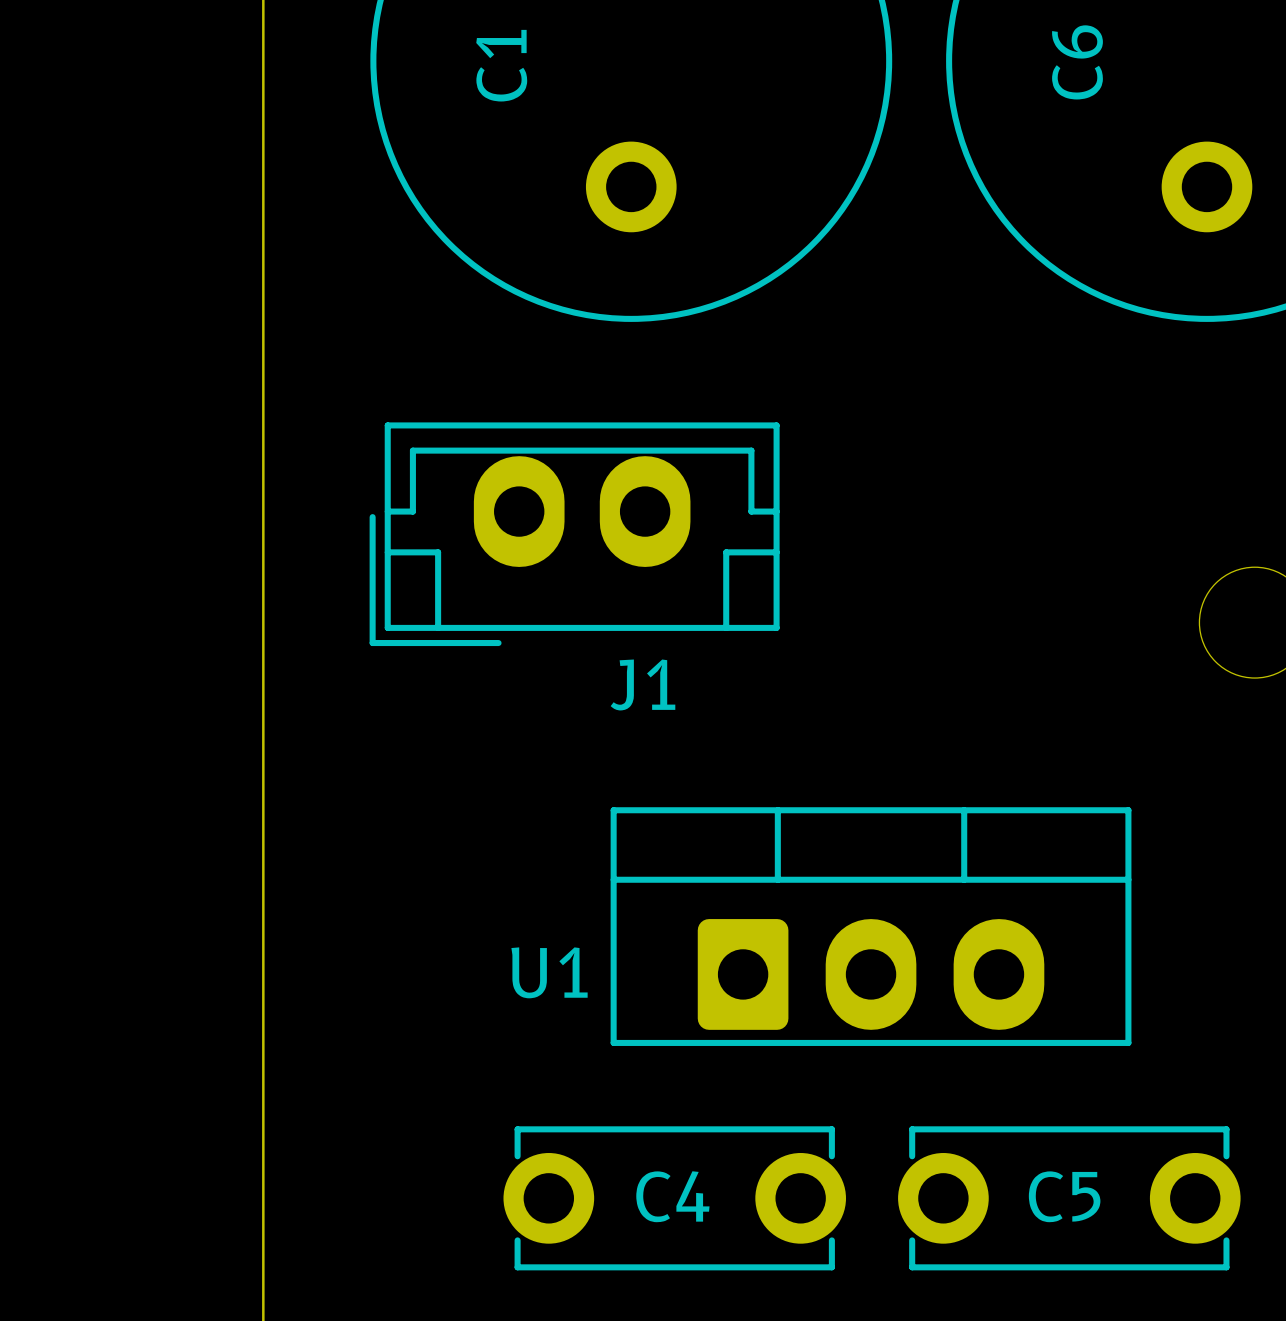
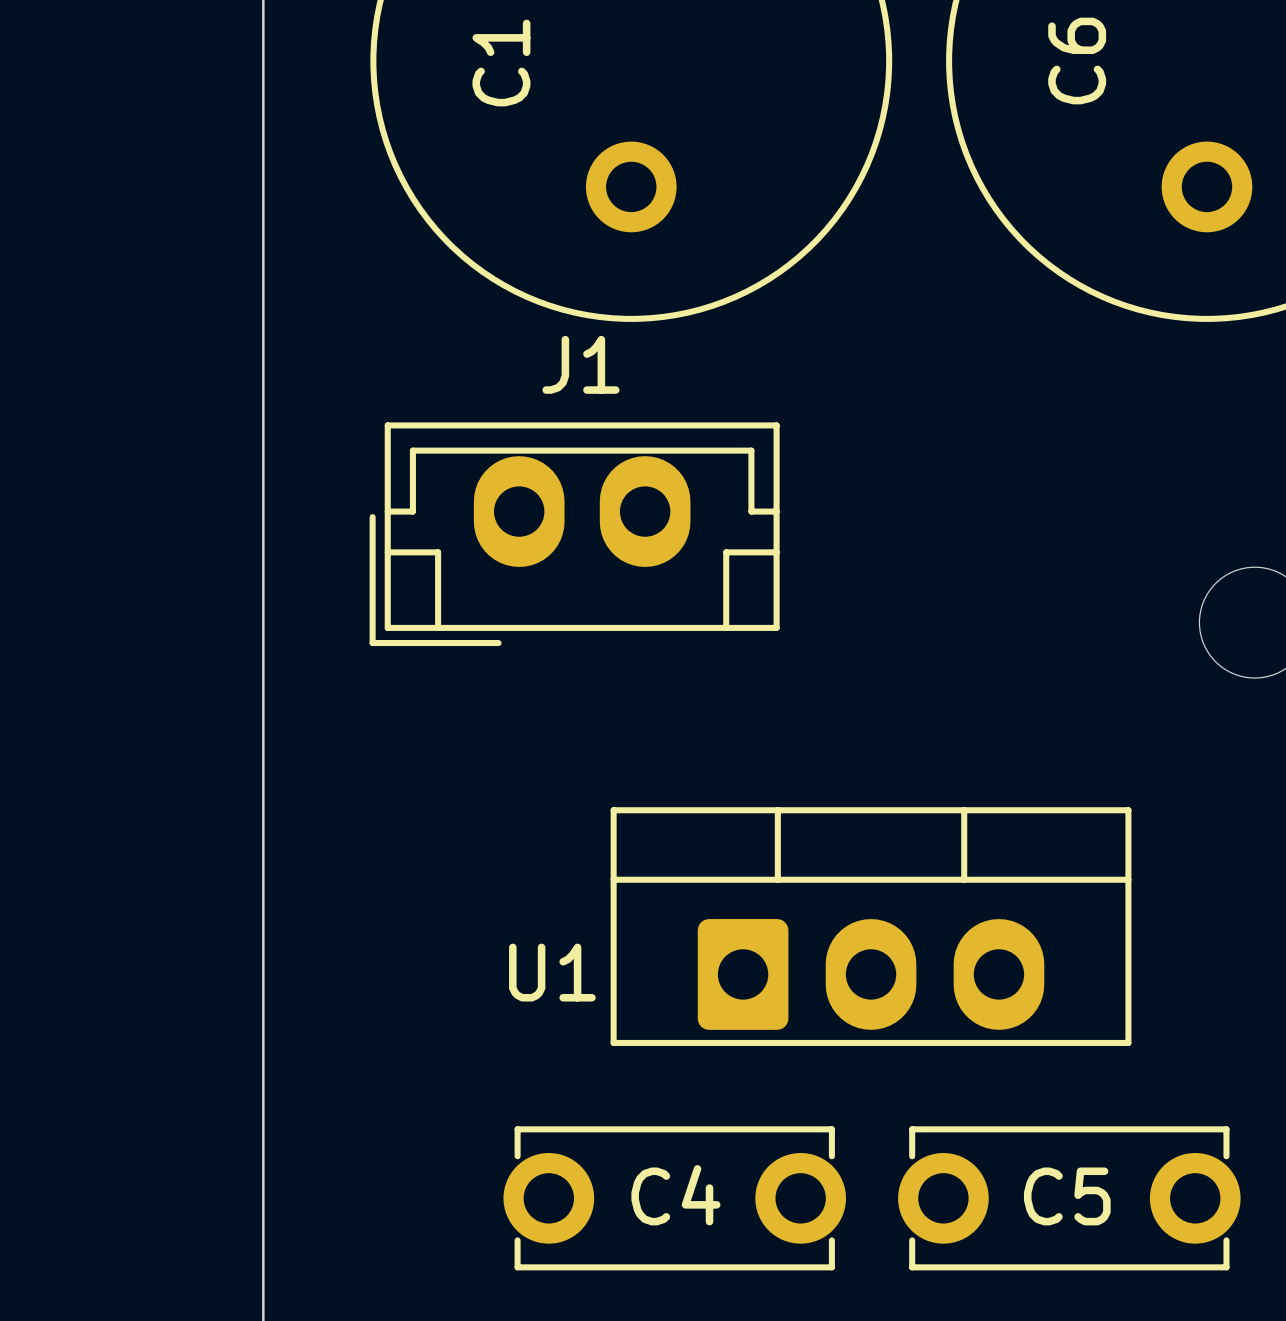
J1 name position: J1 (643, 684) -> J1 (580, 364)

